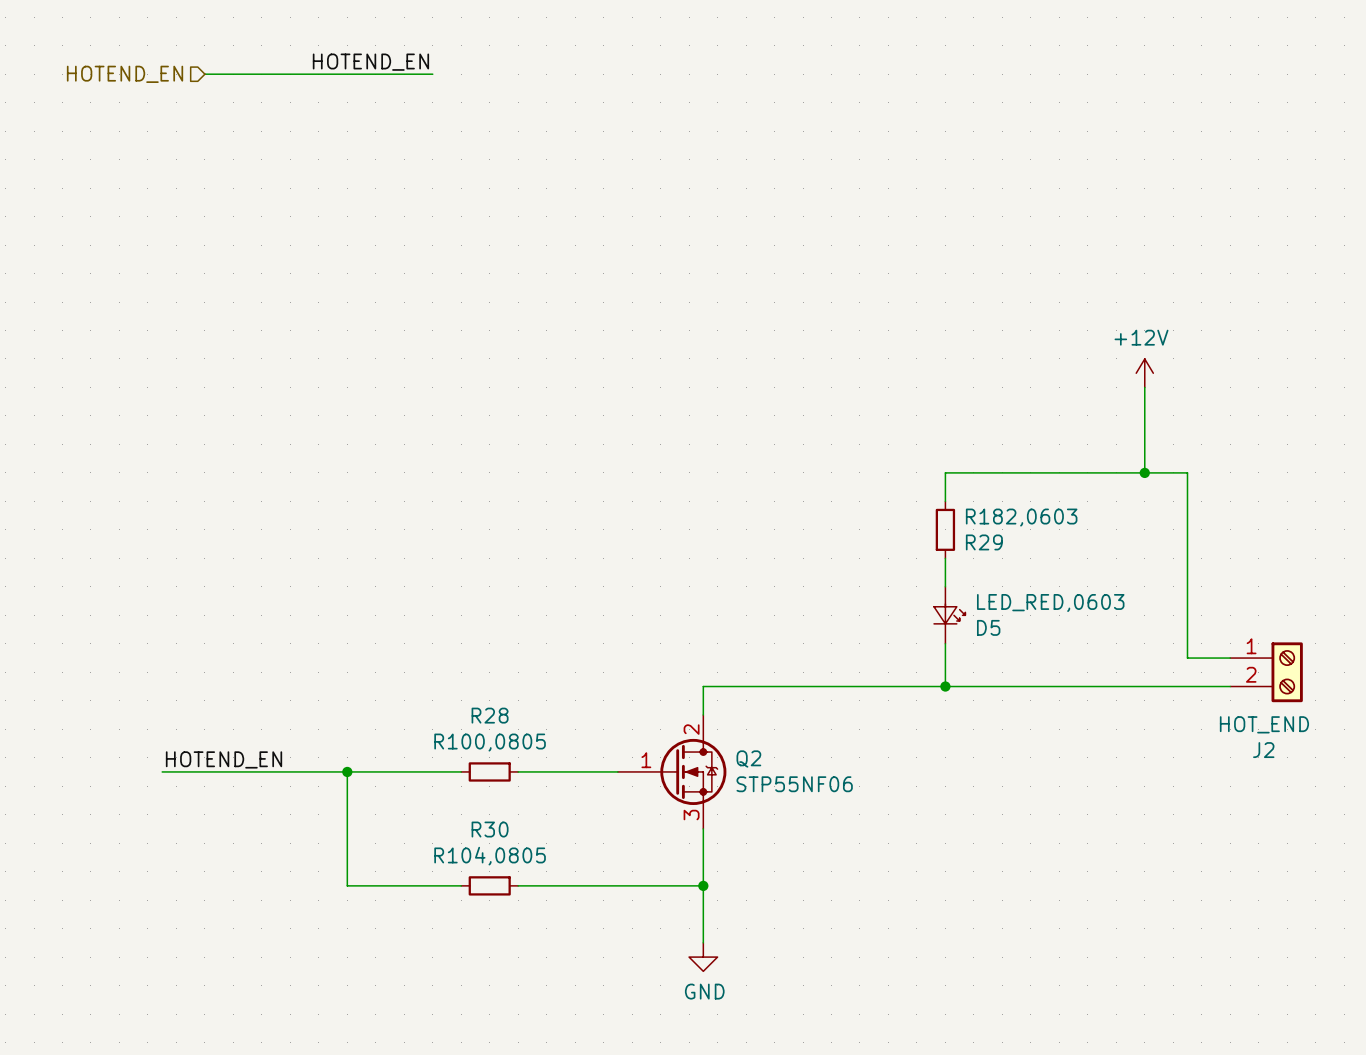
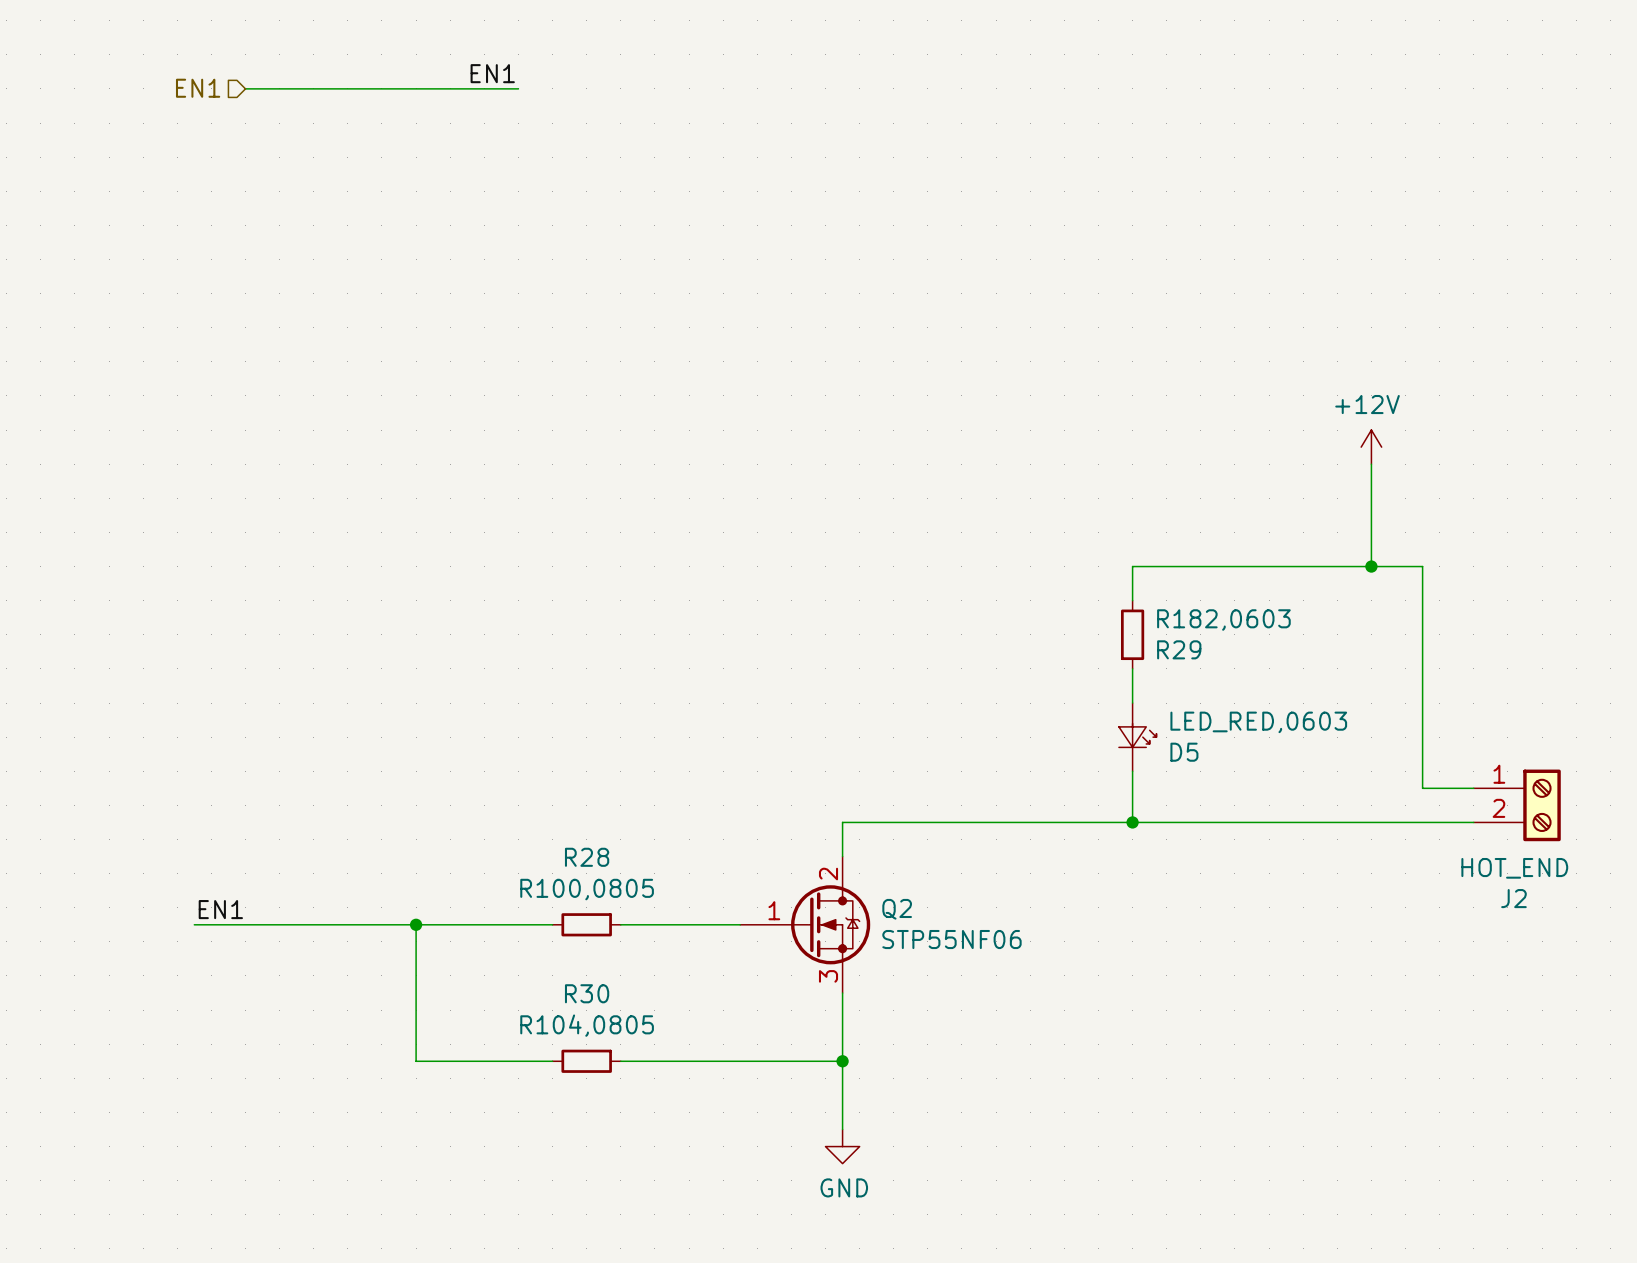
label: HOTEND_EN (370, 62) -> EN1 (492, 73)
hierarchical label: HOTEND_EN (125, 74) -> EN1 (198, 88)
label: HOTEND_EN (224, 759) -> EN1 (220, 909)

